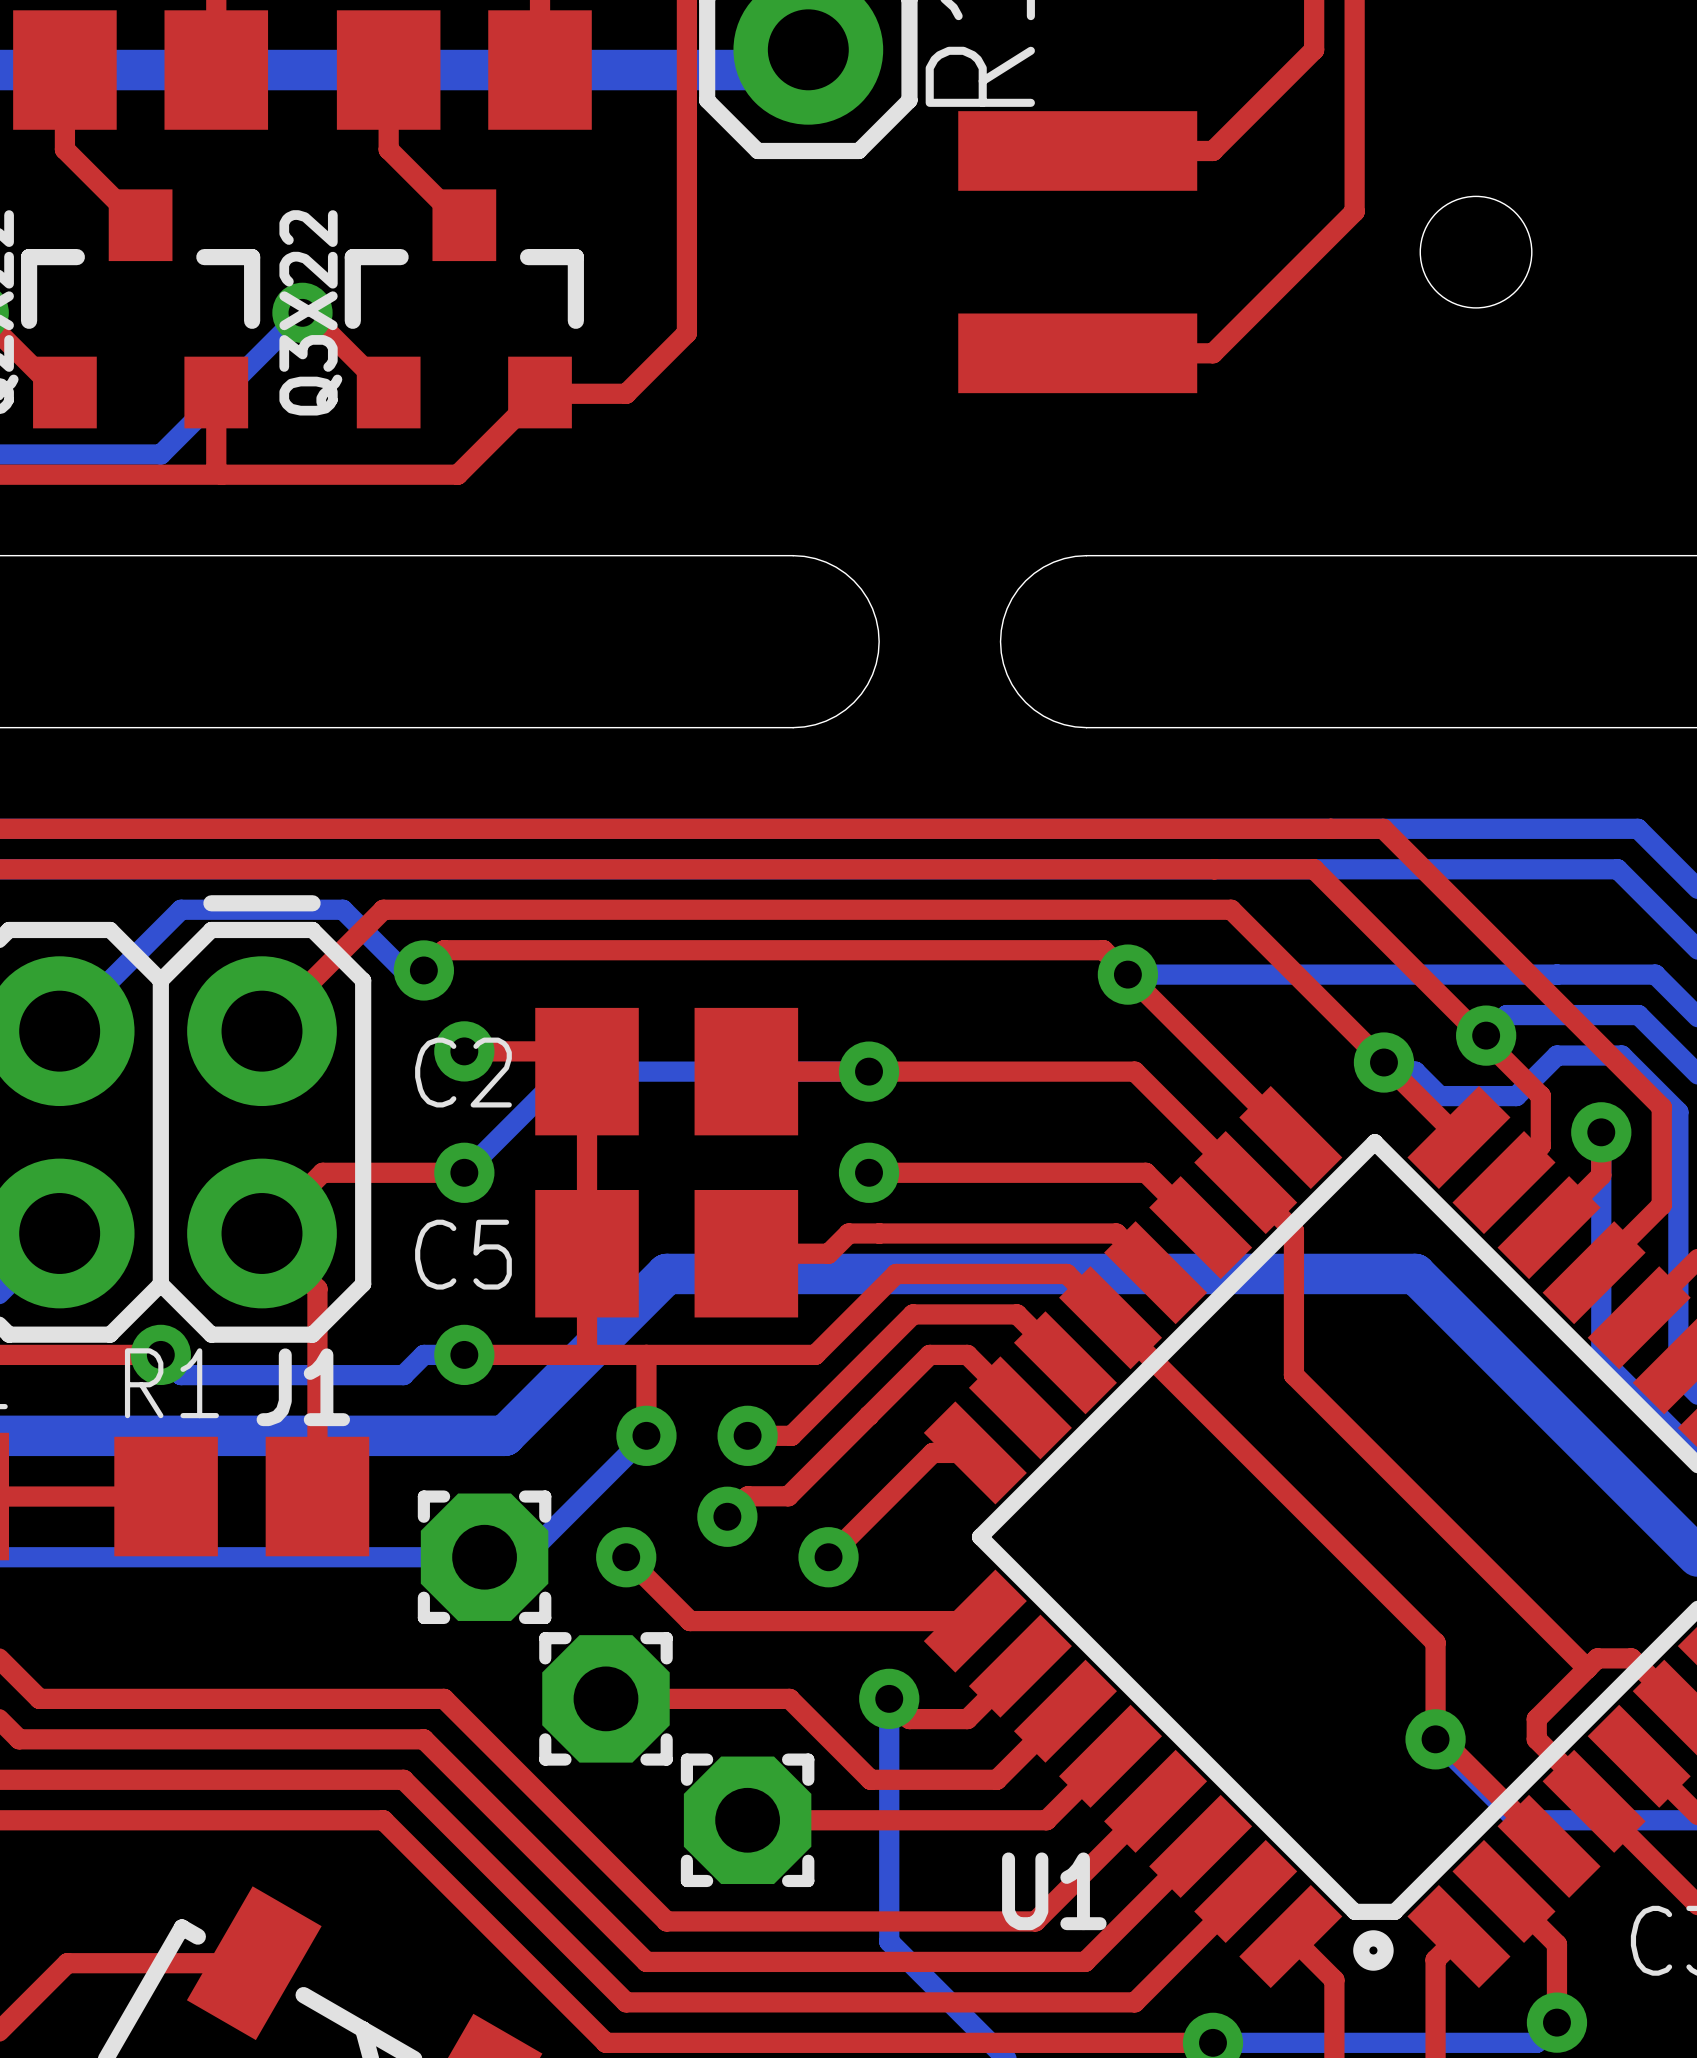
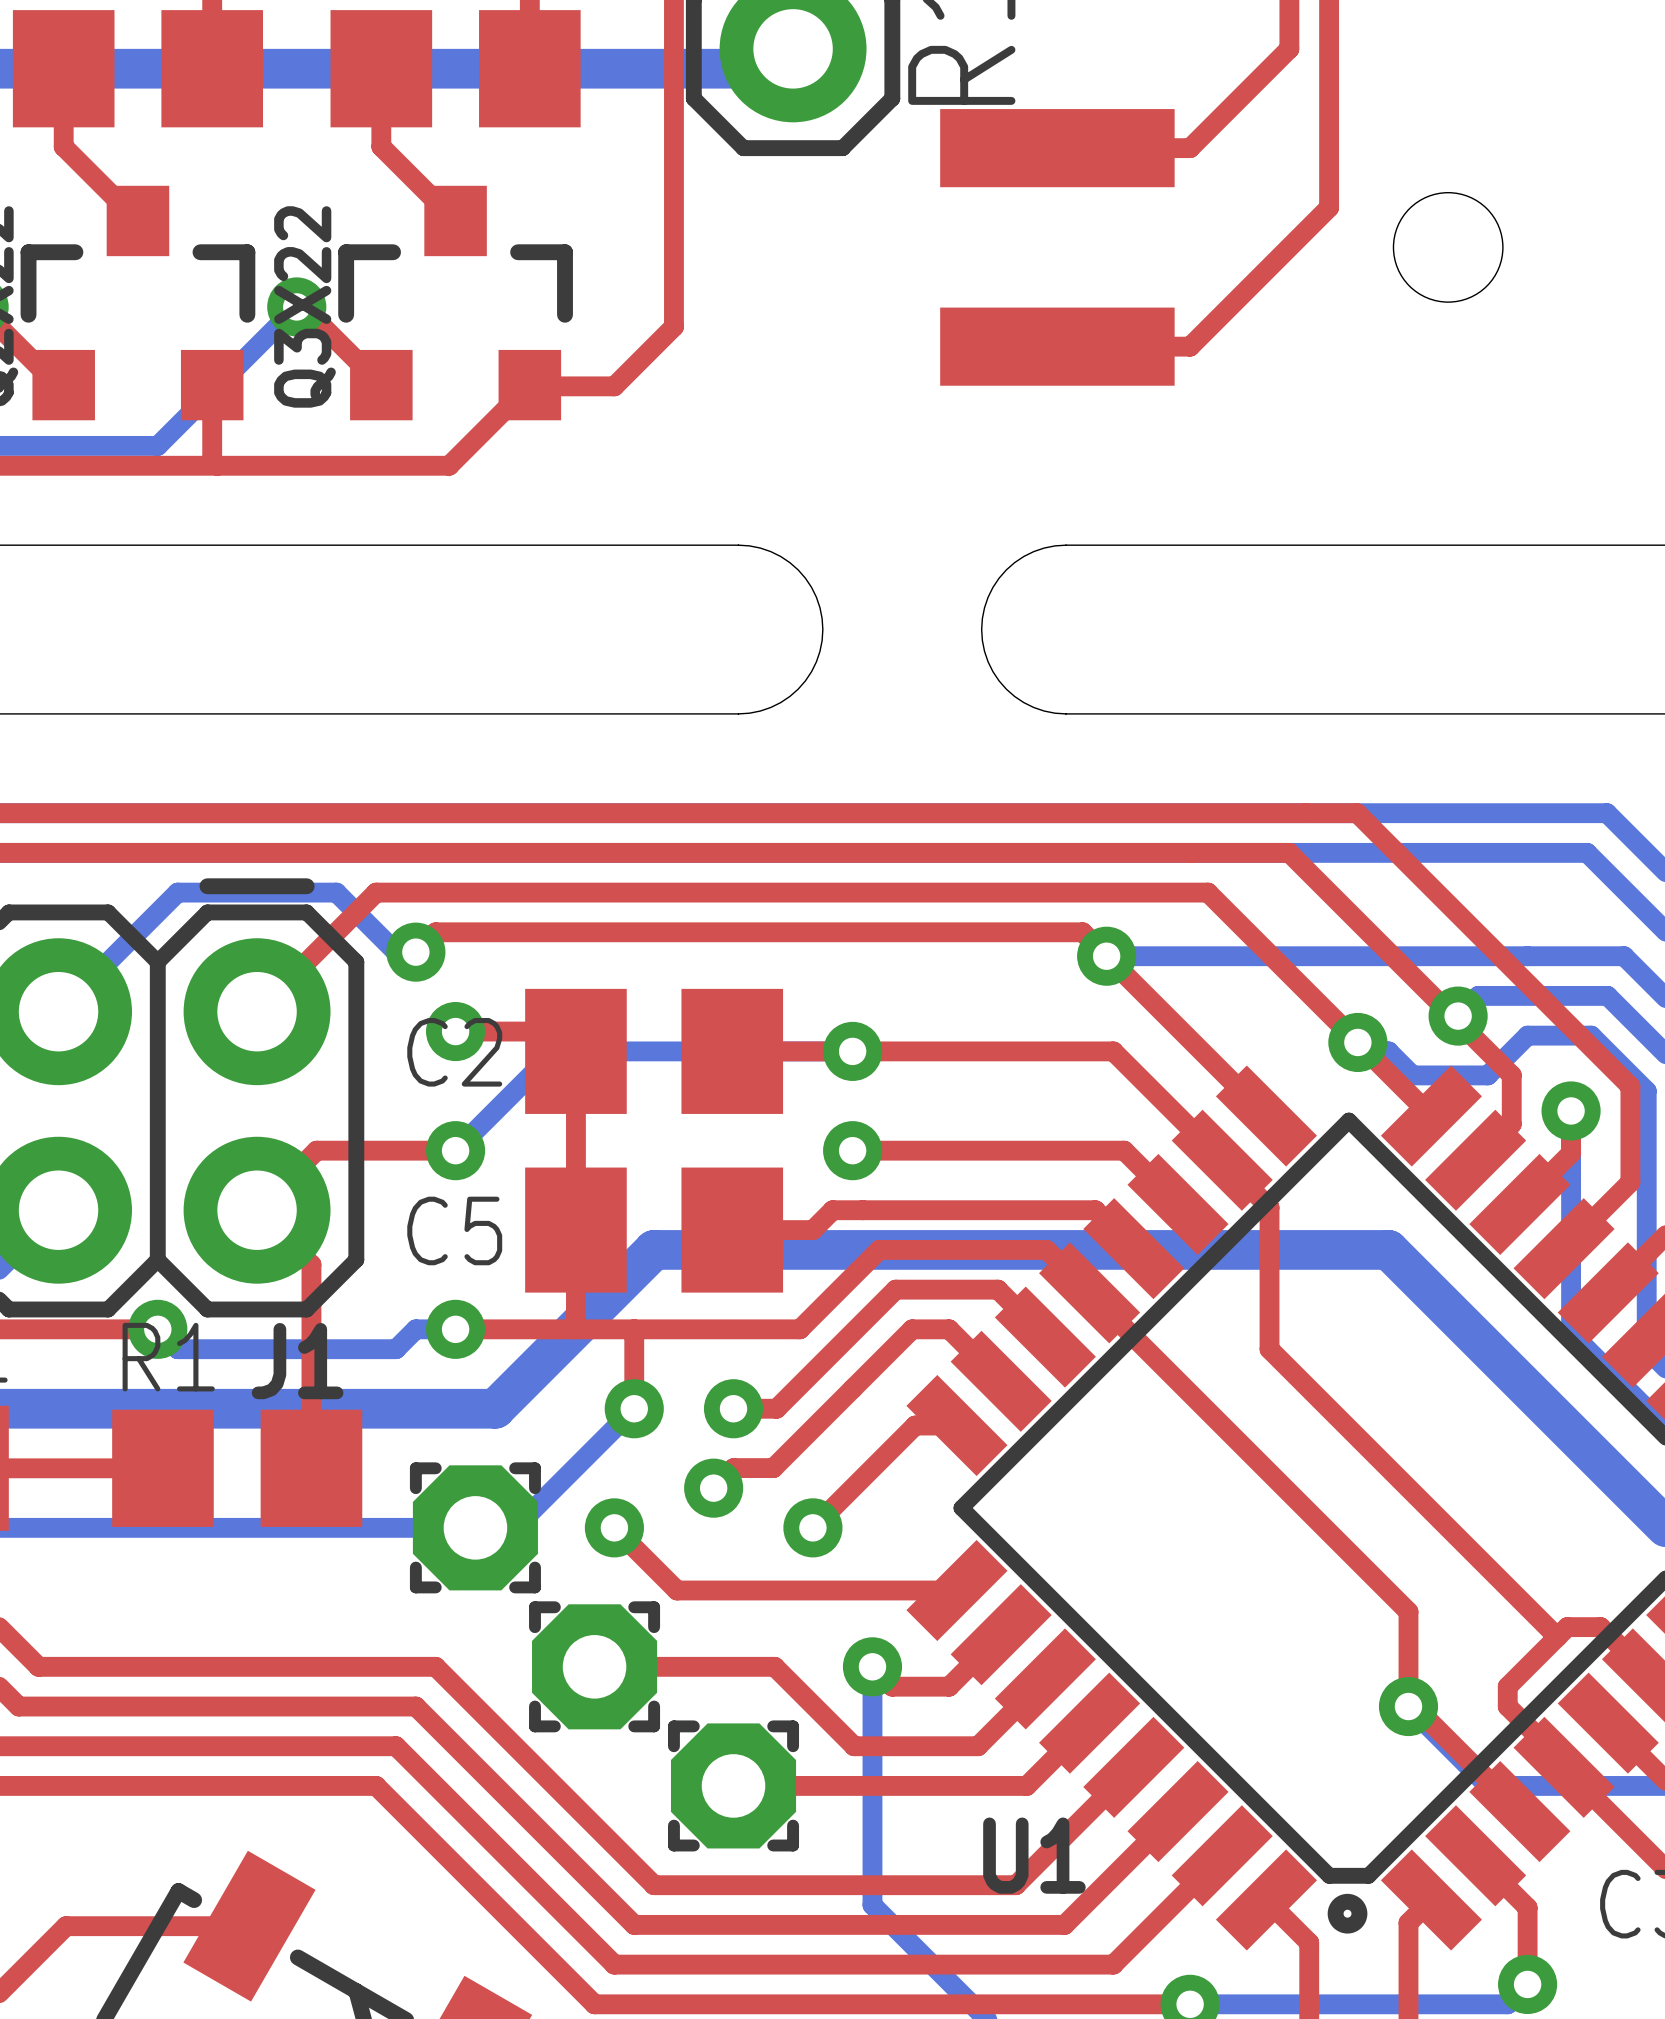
board edge: (752, 555) (804, 556) (826, 562) (845, 573) (867, 598) (876, 619) (879, 641) (876, 663) (867, 684) (845, 709) (826, 721) (804, 726) (752, 727) -> (738, 545) (770, 551) (798, 569) (816, 597) (822, 629) (816, 661) (798, 689) (770, 707) (738, 713)

